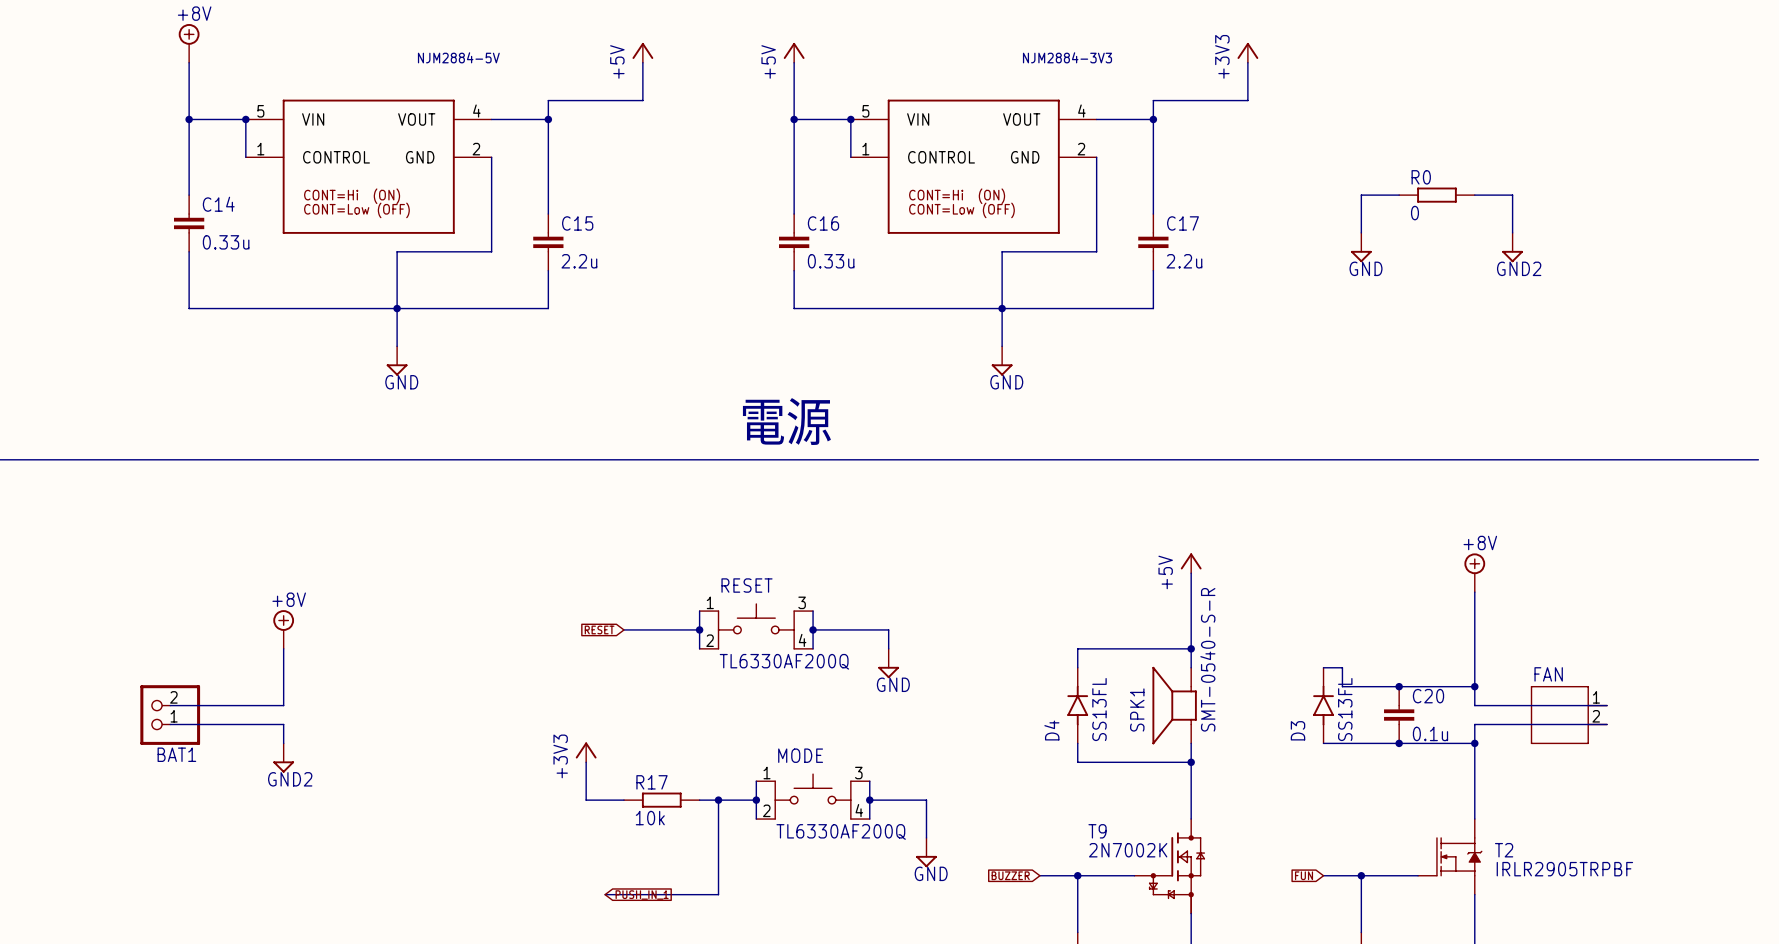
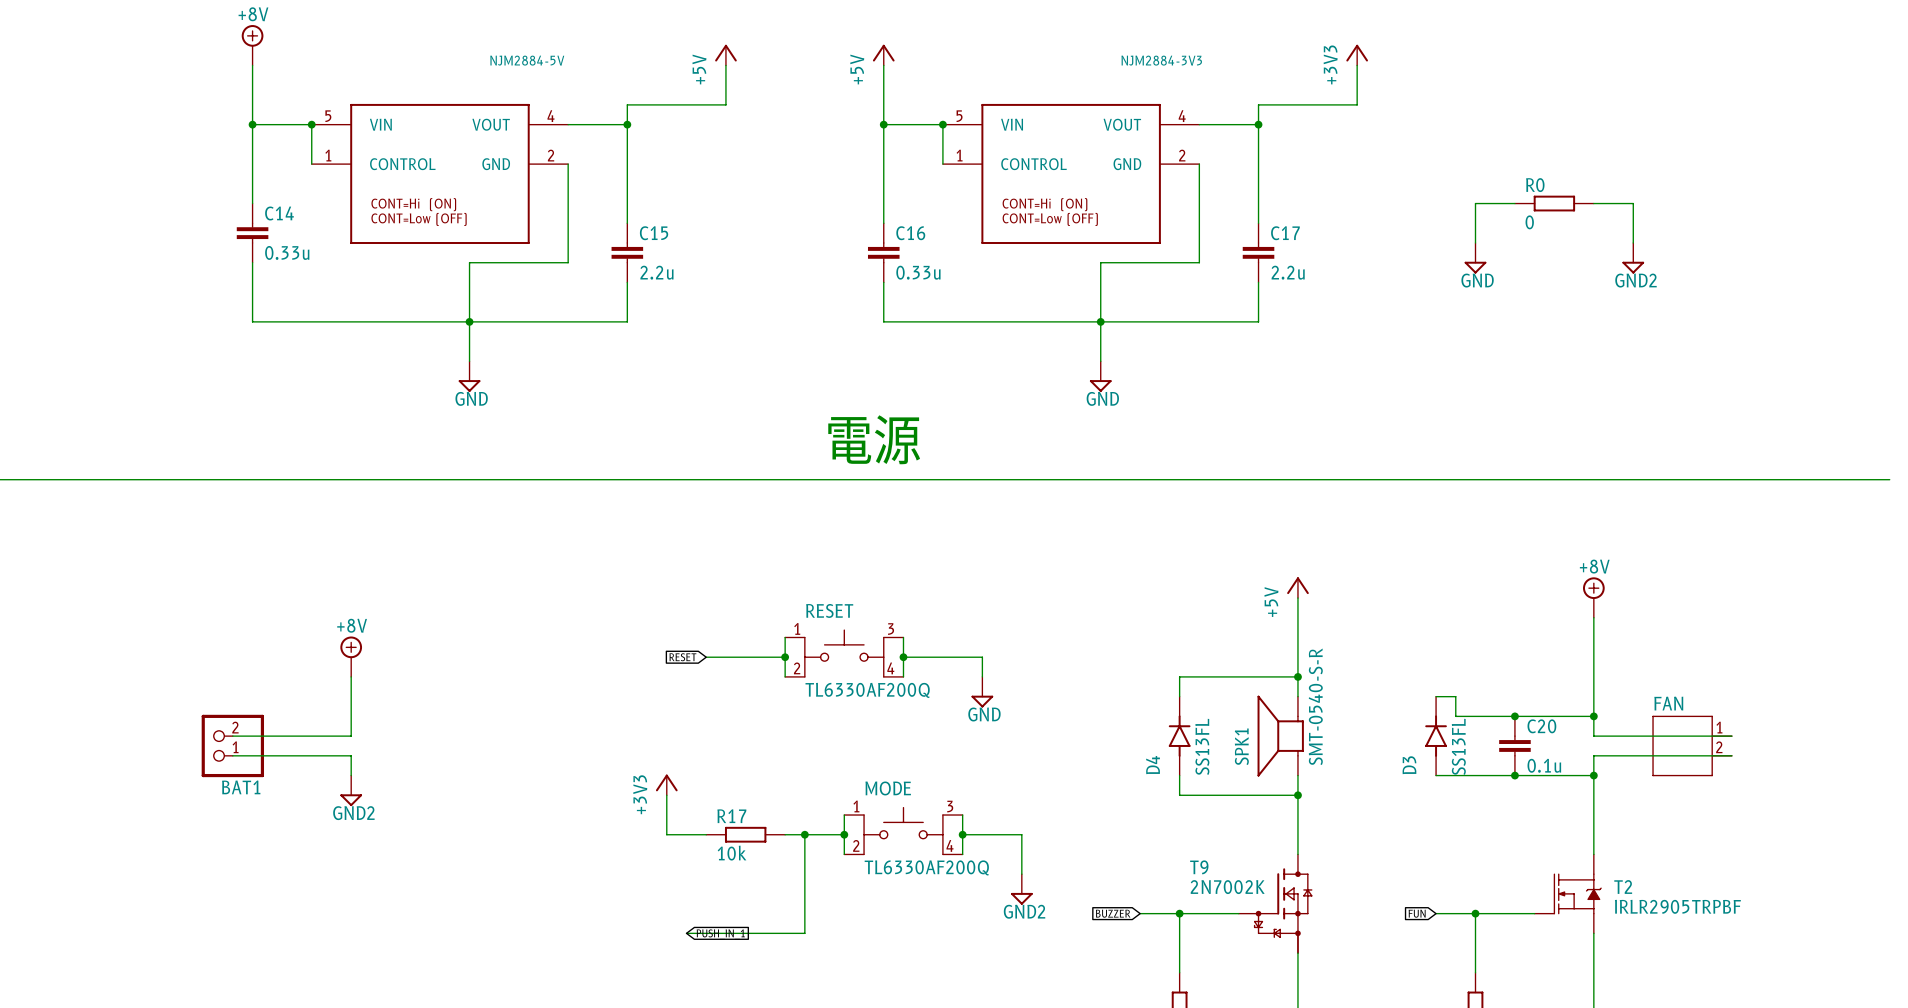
power symbol: GND (926, 852) -> GND2 (1021, 889)

